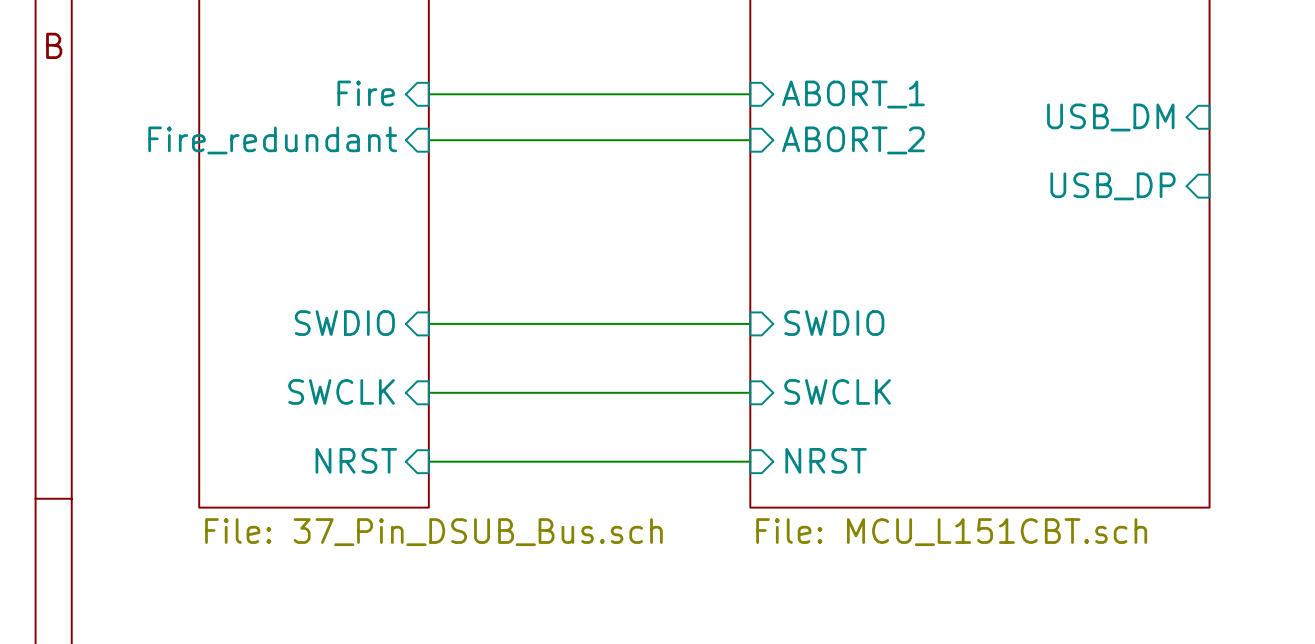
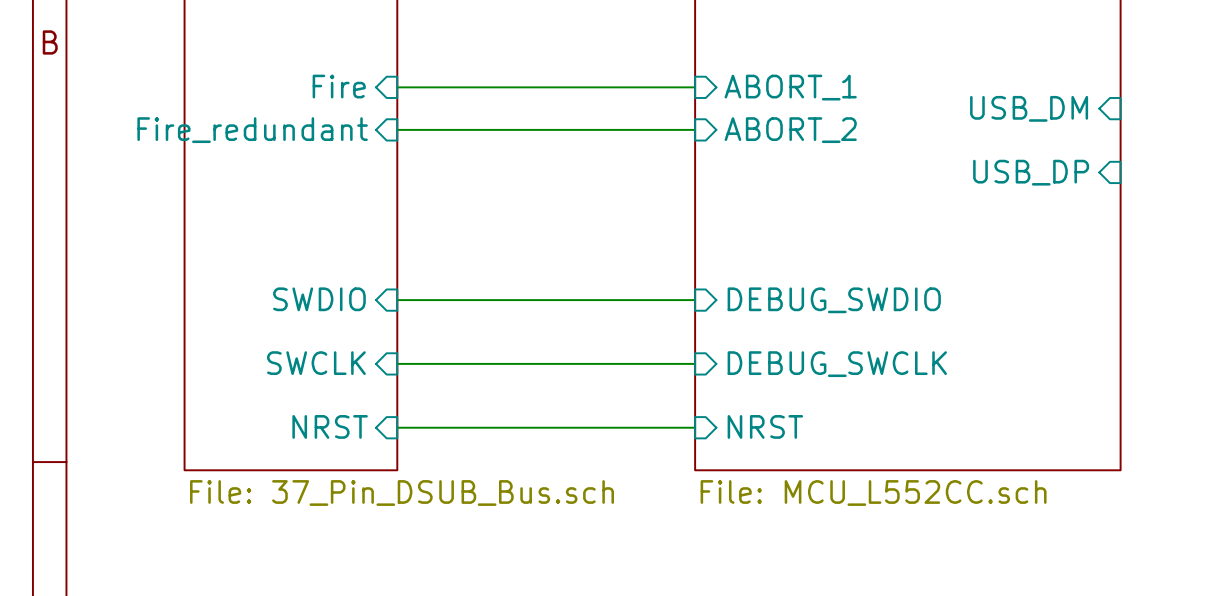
sheet pin: SWDIO (834, 323) -> DEBUG_SWDIO (834, 300)
sheet pin: SWCLK (837, 391) -> DEBUG_SWCLK (837, 364)
sheet value: File: MCU_L151CBT.sch (951, 532) -> File: MCU_L552CC.sch (873, 492)

